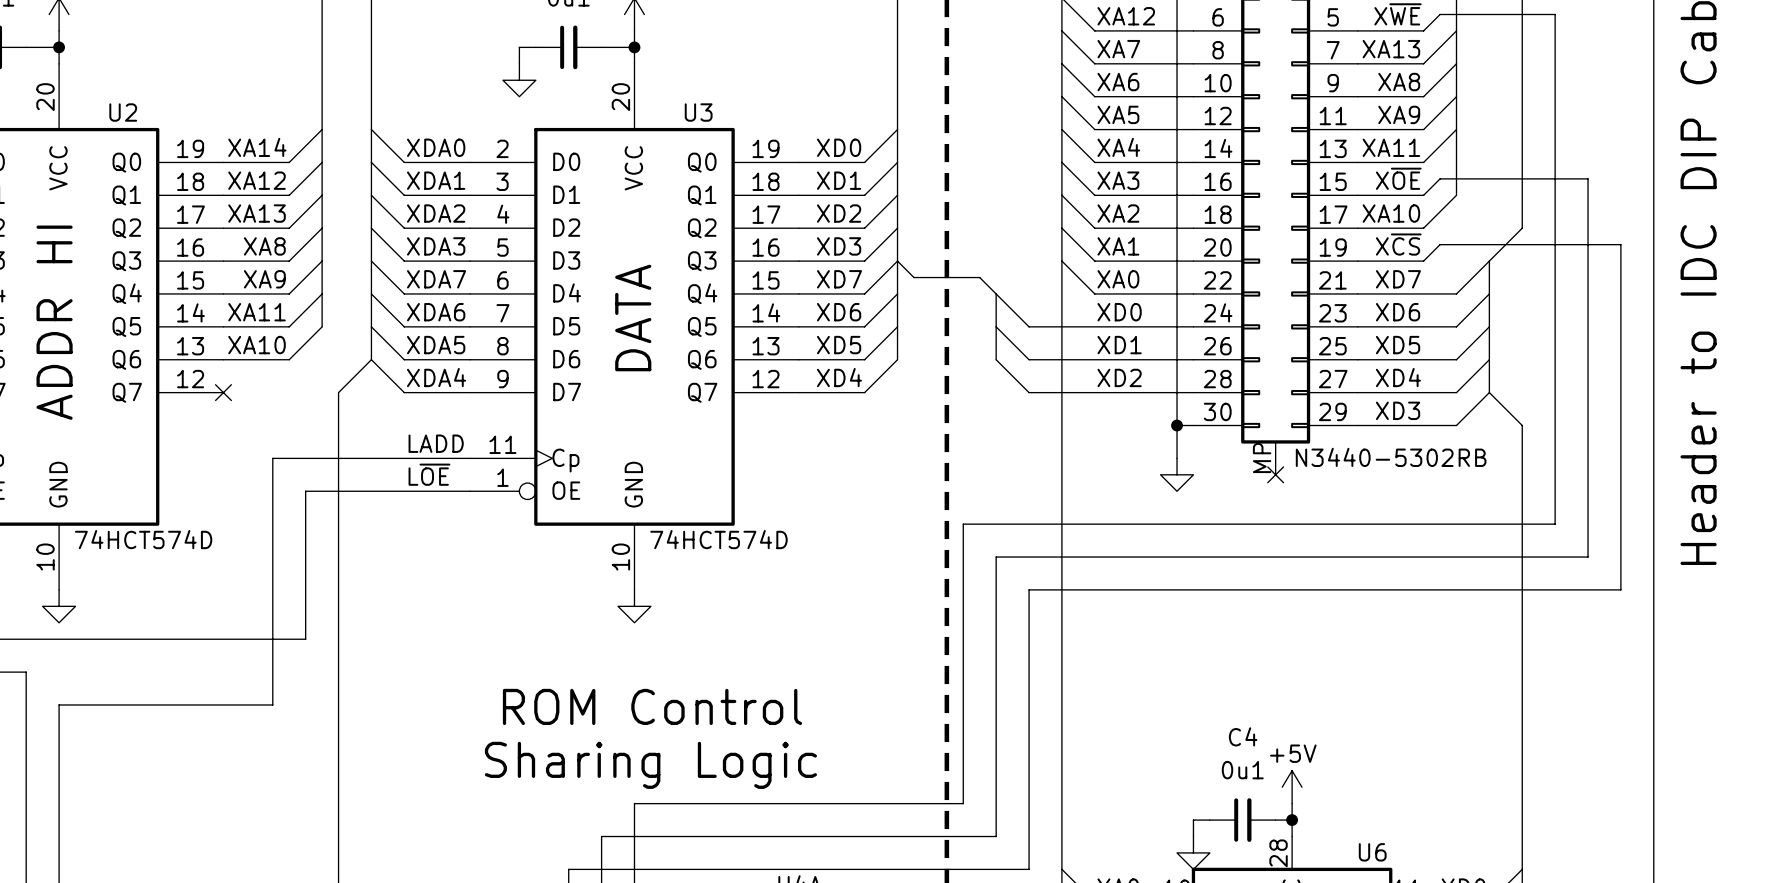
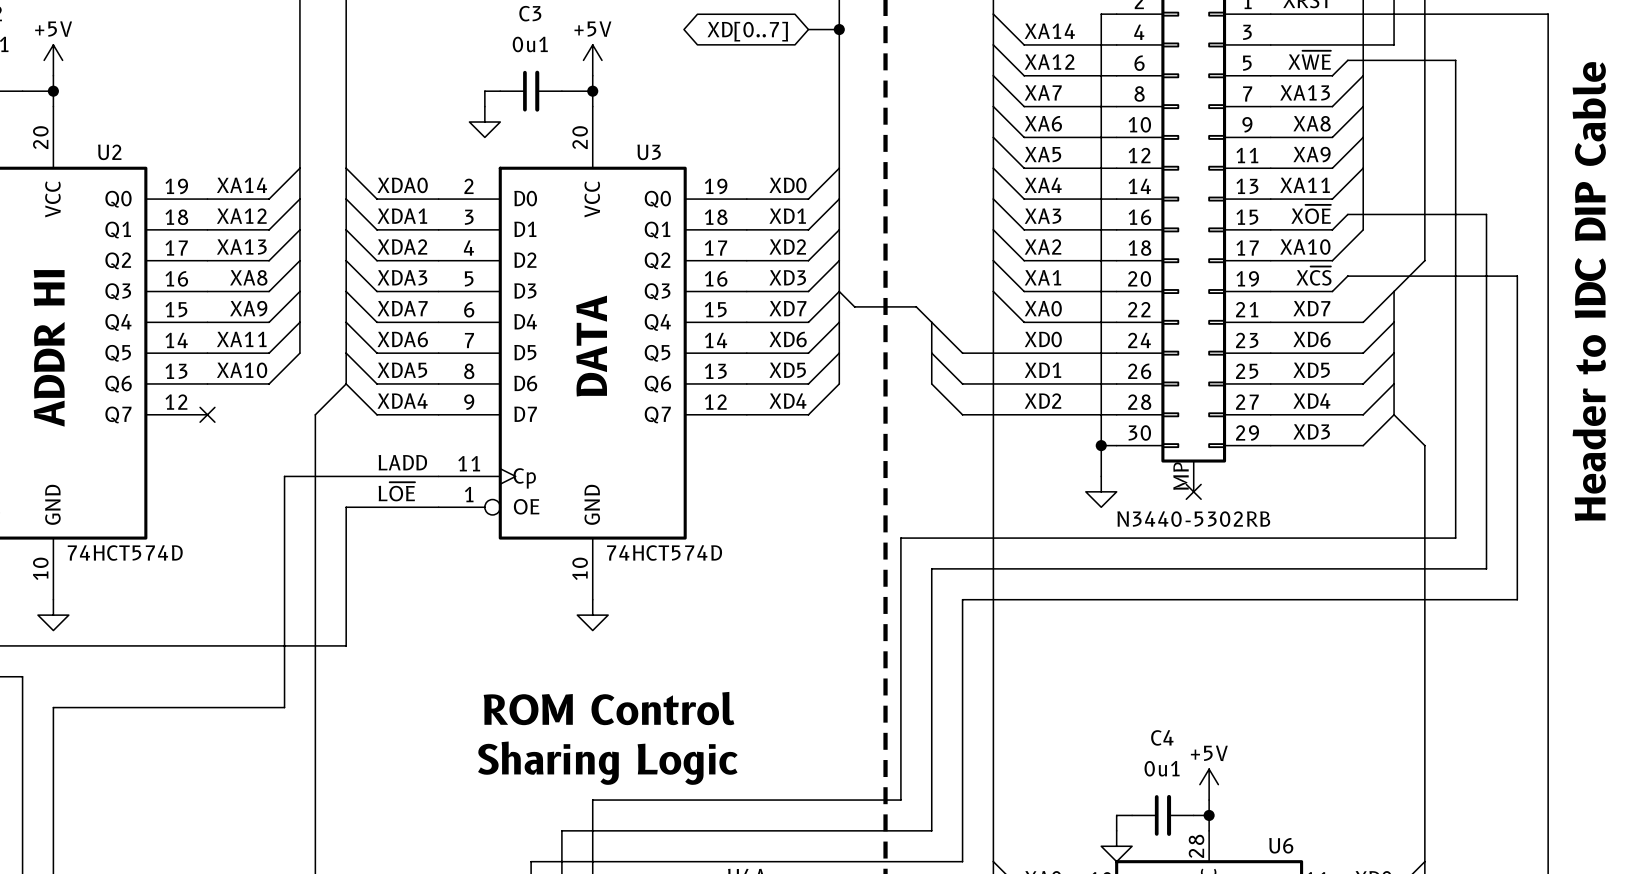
part value position: N3440-5302RB (1391, 457) -> N3440-5302RB (1193, 519)
wire: (305, 458) (272, 458) (272, 704) -> (346, 507) (346, 645) (284, 645) (284, 707) (253, 707)
wire: (305, 491) (371, 491) -> (284, 507) (284, 476)

